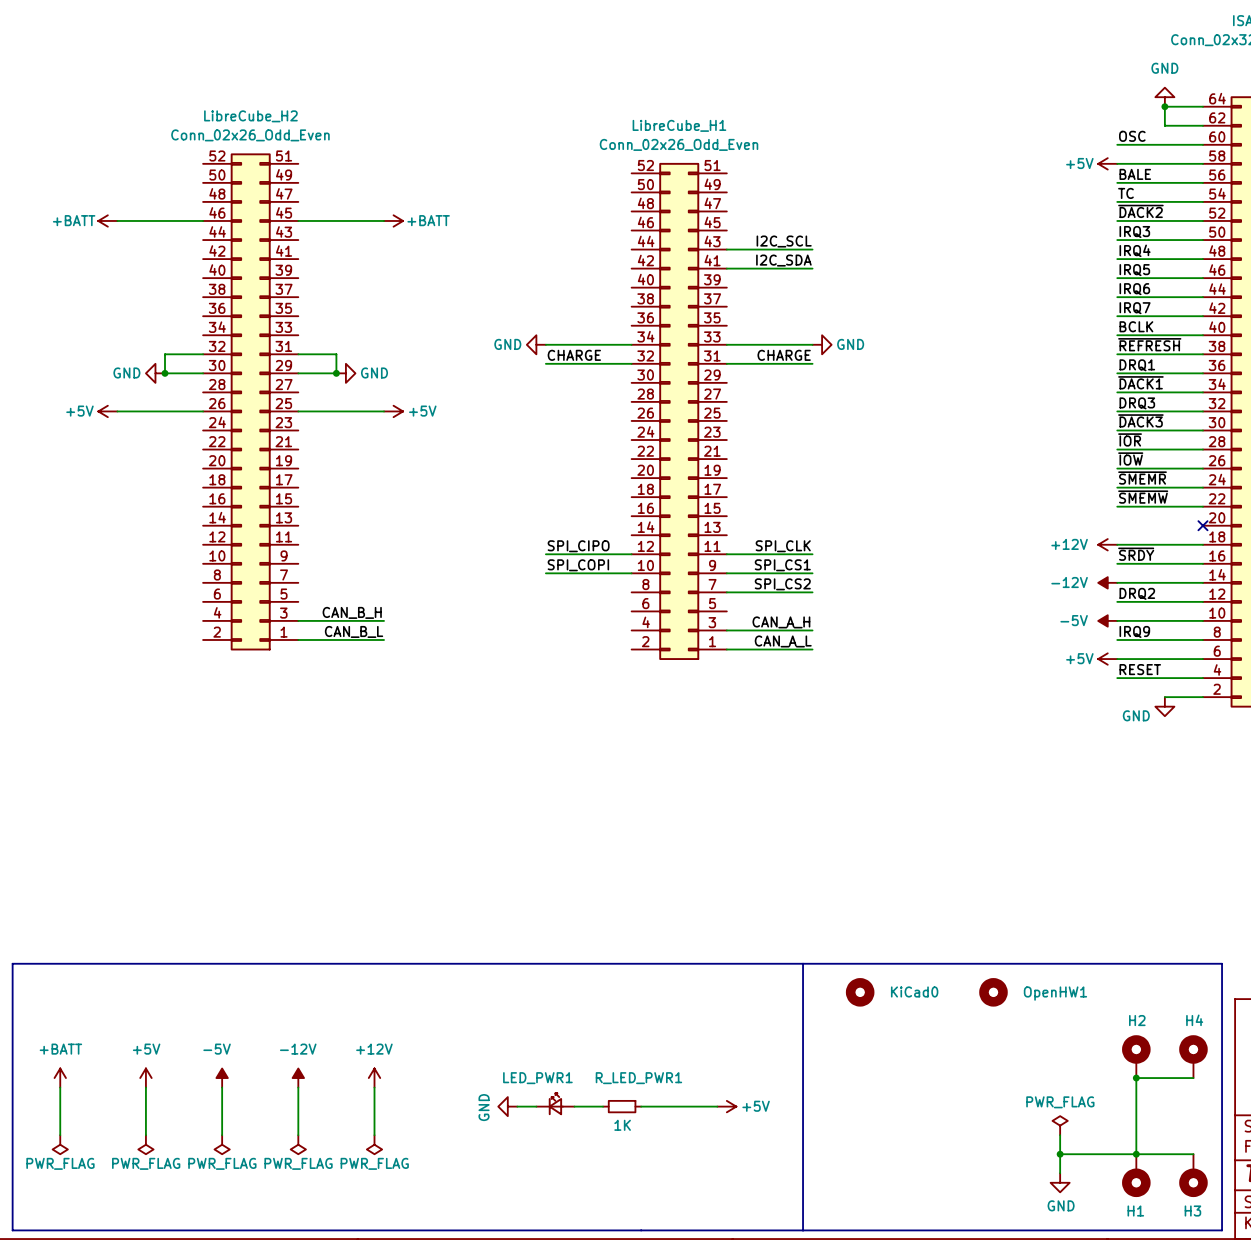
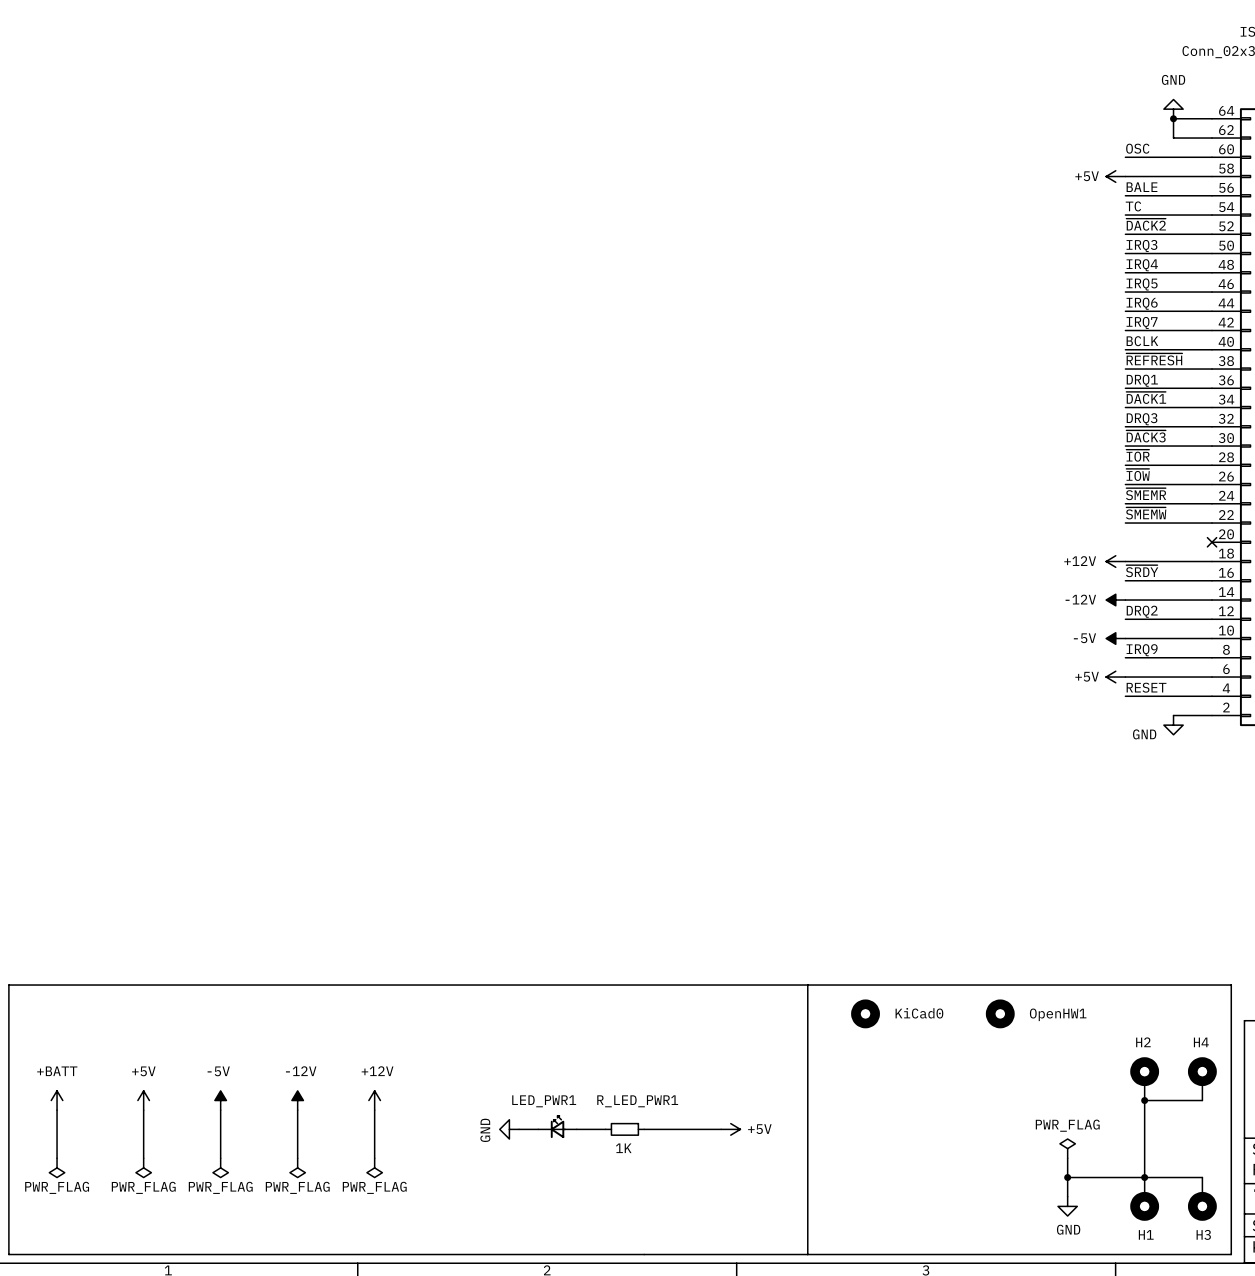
power symbol: +BATT (107, 220) -> none
wire: (117, 220) (203, 220) -> none
wire: (298, 220) (384, 220) -> none
power symbol: +BATT (393, 220) -> none
label: I2C_SCL (784, 241) -> none
wire: (726, 249) (812, 249) -> none
label: I2C_SDA (783, 260) -> none
wire: (726, 268) (812, 268) -> none
power symbol: GND (536, 344) -> none
wire: (545, 344) (631, 344) -> none
wire: (726, 344) (812, 344) -> none
power symbol: GND (822, 344) -> none
wire: (203, 354) (165, 354) (165, 373) (203, 373) -> none
wire: (298, 354) (336, 354) (336, 373) (298, 373) -> none
label: CHARGE (574, 355) -> none
label: CHARGE (784, 355) -> none
wire: (545, 363) (631, 363) -> none
wire: (726, 363) (812, 363) -> none
power symbol: GND (155, 373) -> none
junction: (165, 373) -> none
junction: (336, 373) -> none
power symbol: GND (345, 373) -> none
LibreCube_H2: Conn_02x26_Odd_Even (250, 401) -> none
power symbol: +5V (107, 411) -> none
wire: (117, 411) (203, 411) -> none
wire: (298, 411) (384, 411) -> none
power symbol: +5V (393, 411) -> none
LibreCube_H1: Conn_02x26_Odd_Even (679, 411) -> none
label: SPI_CIPO (578, 546) -> none
label: SPI_CLK (783, 546) -> none
wire: (545, 554) (631, 554) -> none
wire: (726, 554) (812, 554) -> none
label: SPI_COPI (578, 565) -> none
label: SPI_CS1 (782, 565) -> none
wire: (545, 573) (631, 573) -> none
wire: (726, 573) (812, 573) -> none
label: SPI_CS2 (782, 584) -> none
wire: (726, 592) (812, 592) -> none
label: CAN_B_H (352, 612) -> none
wire: (298, 620) (384, 620) -> none
label: CAN_A_H (781, 622) -> none
wire: (726, 630) (812, 630) -> none
label: CAN_B_L (354, 631) -> none
wire: (298, 639) (384, 639) -> none
label: CAN_A_L (783, 641) -> none
wire: (726, 649) (812, 649) -> none

